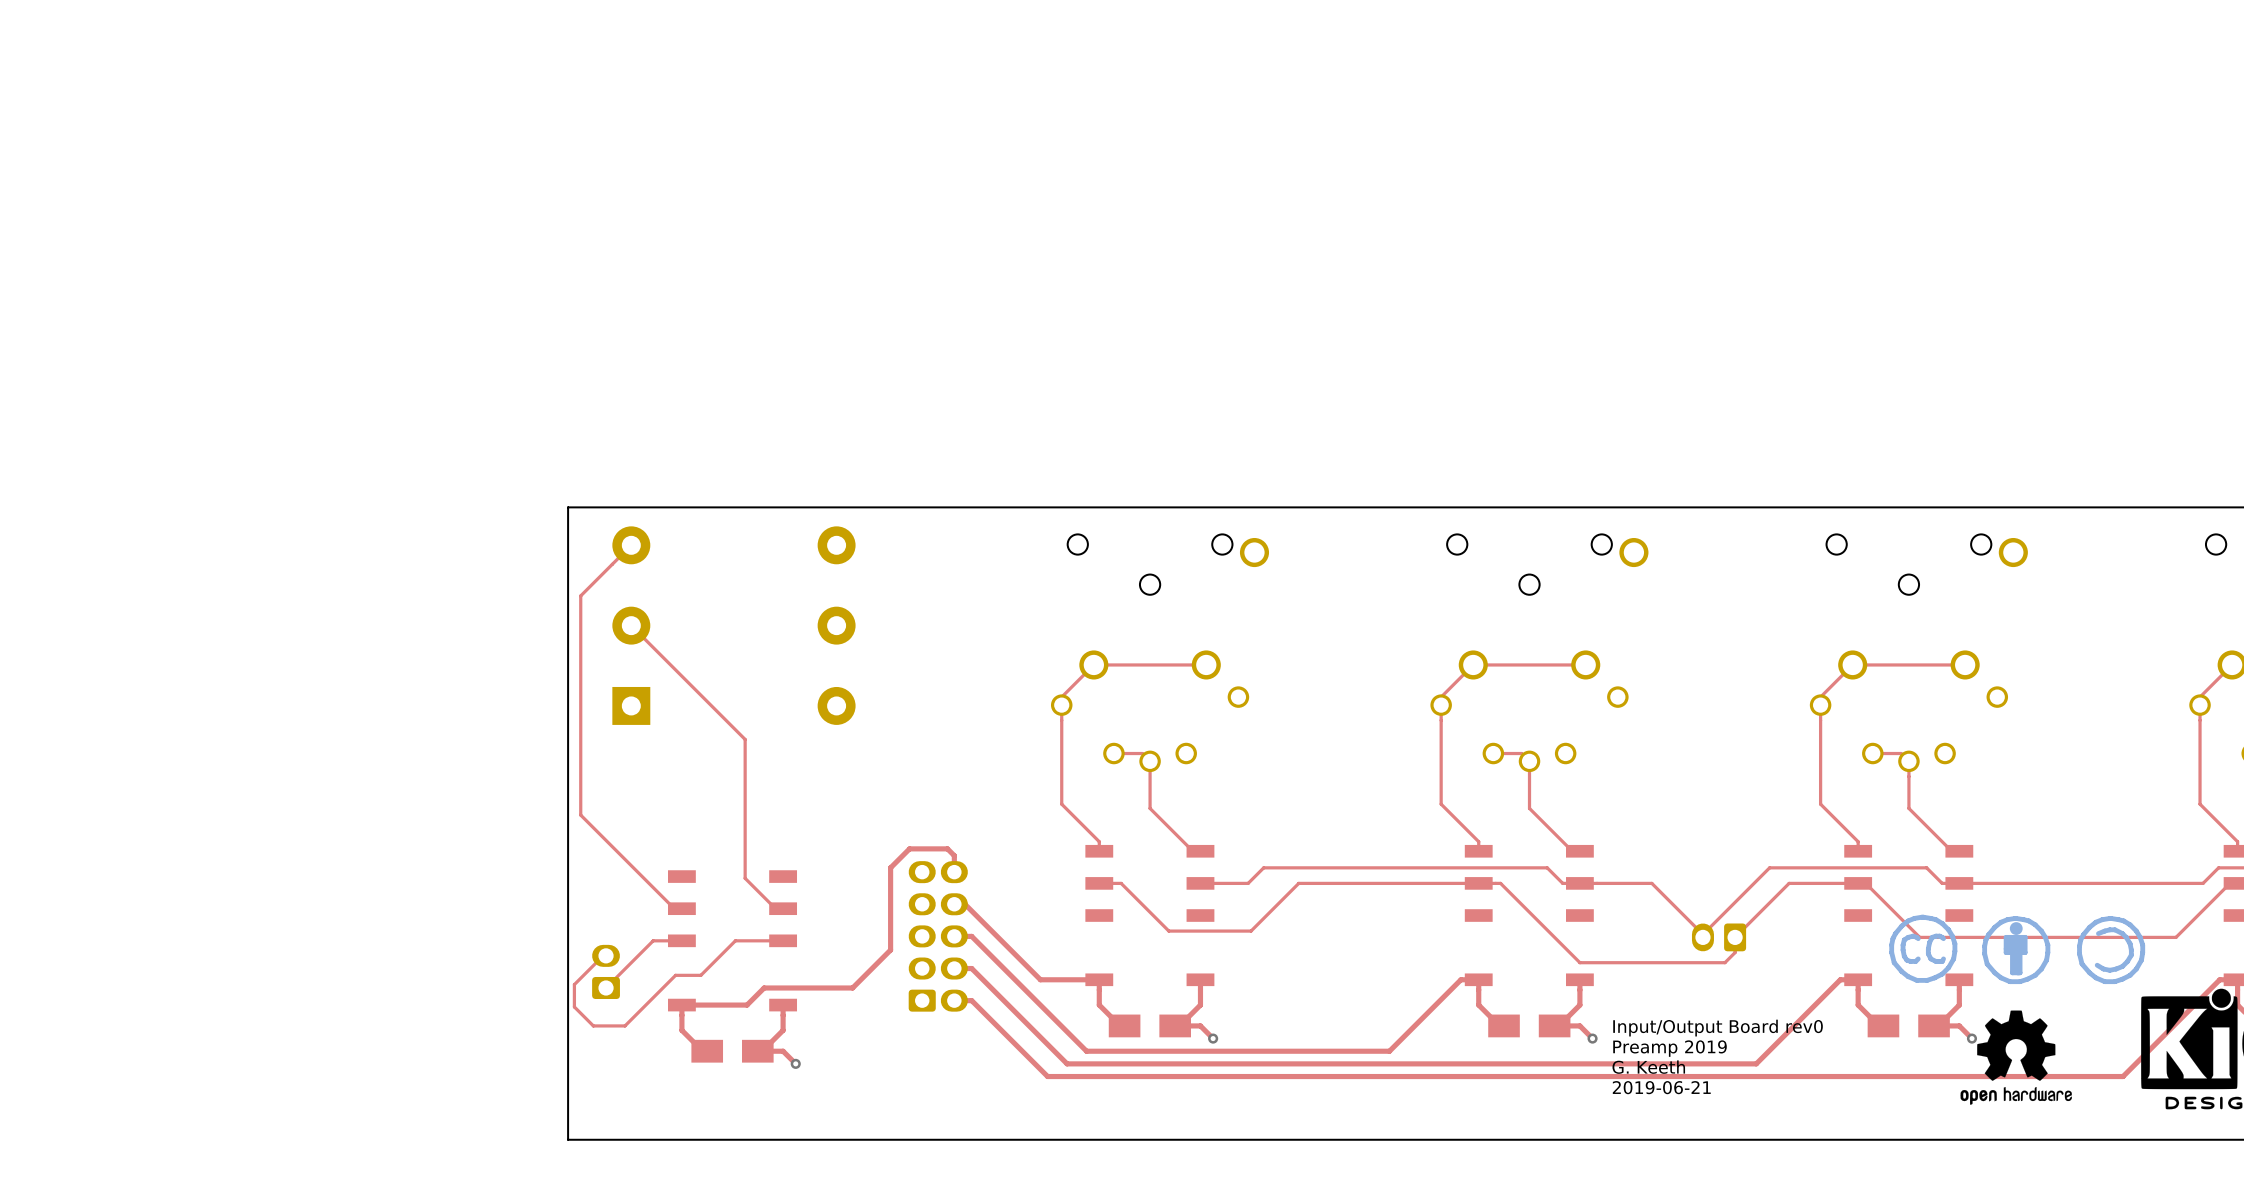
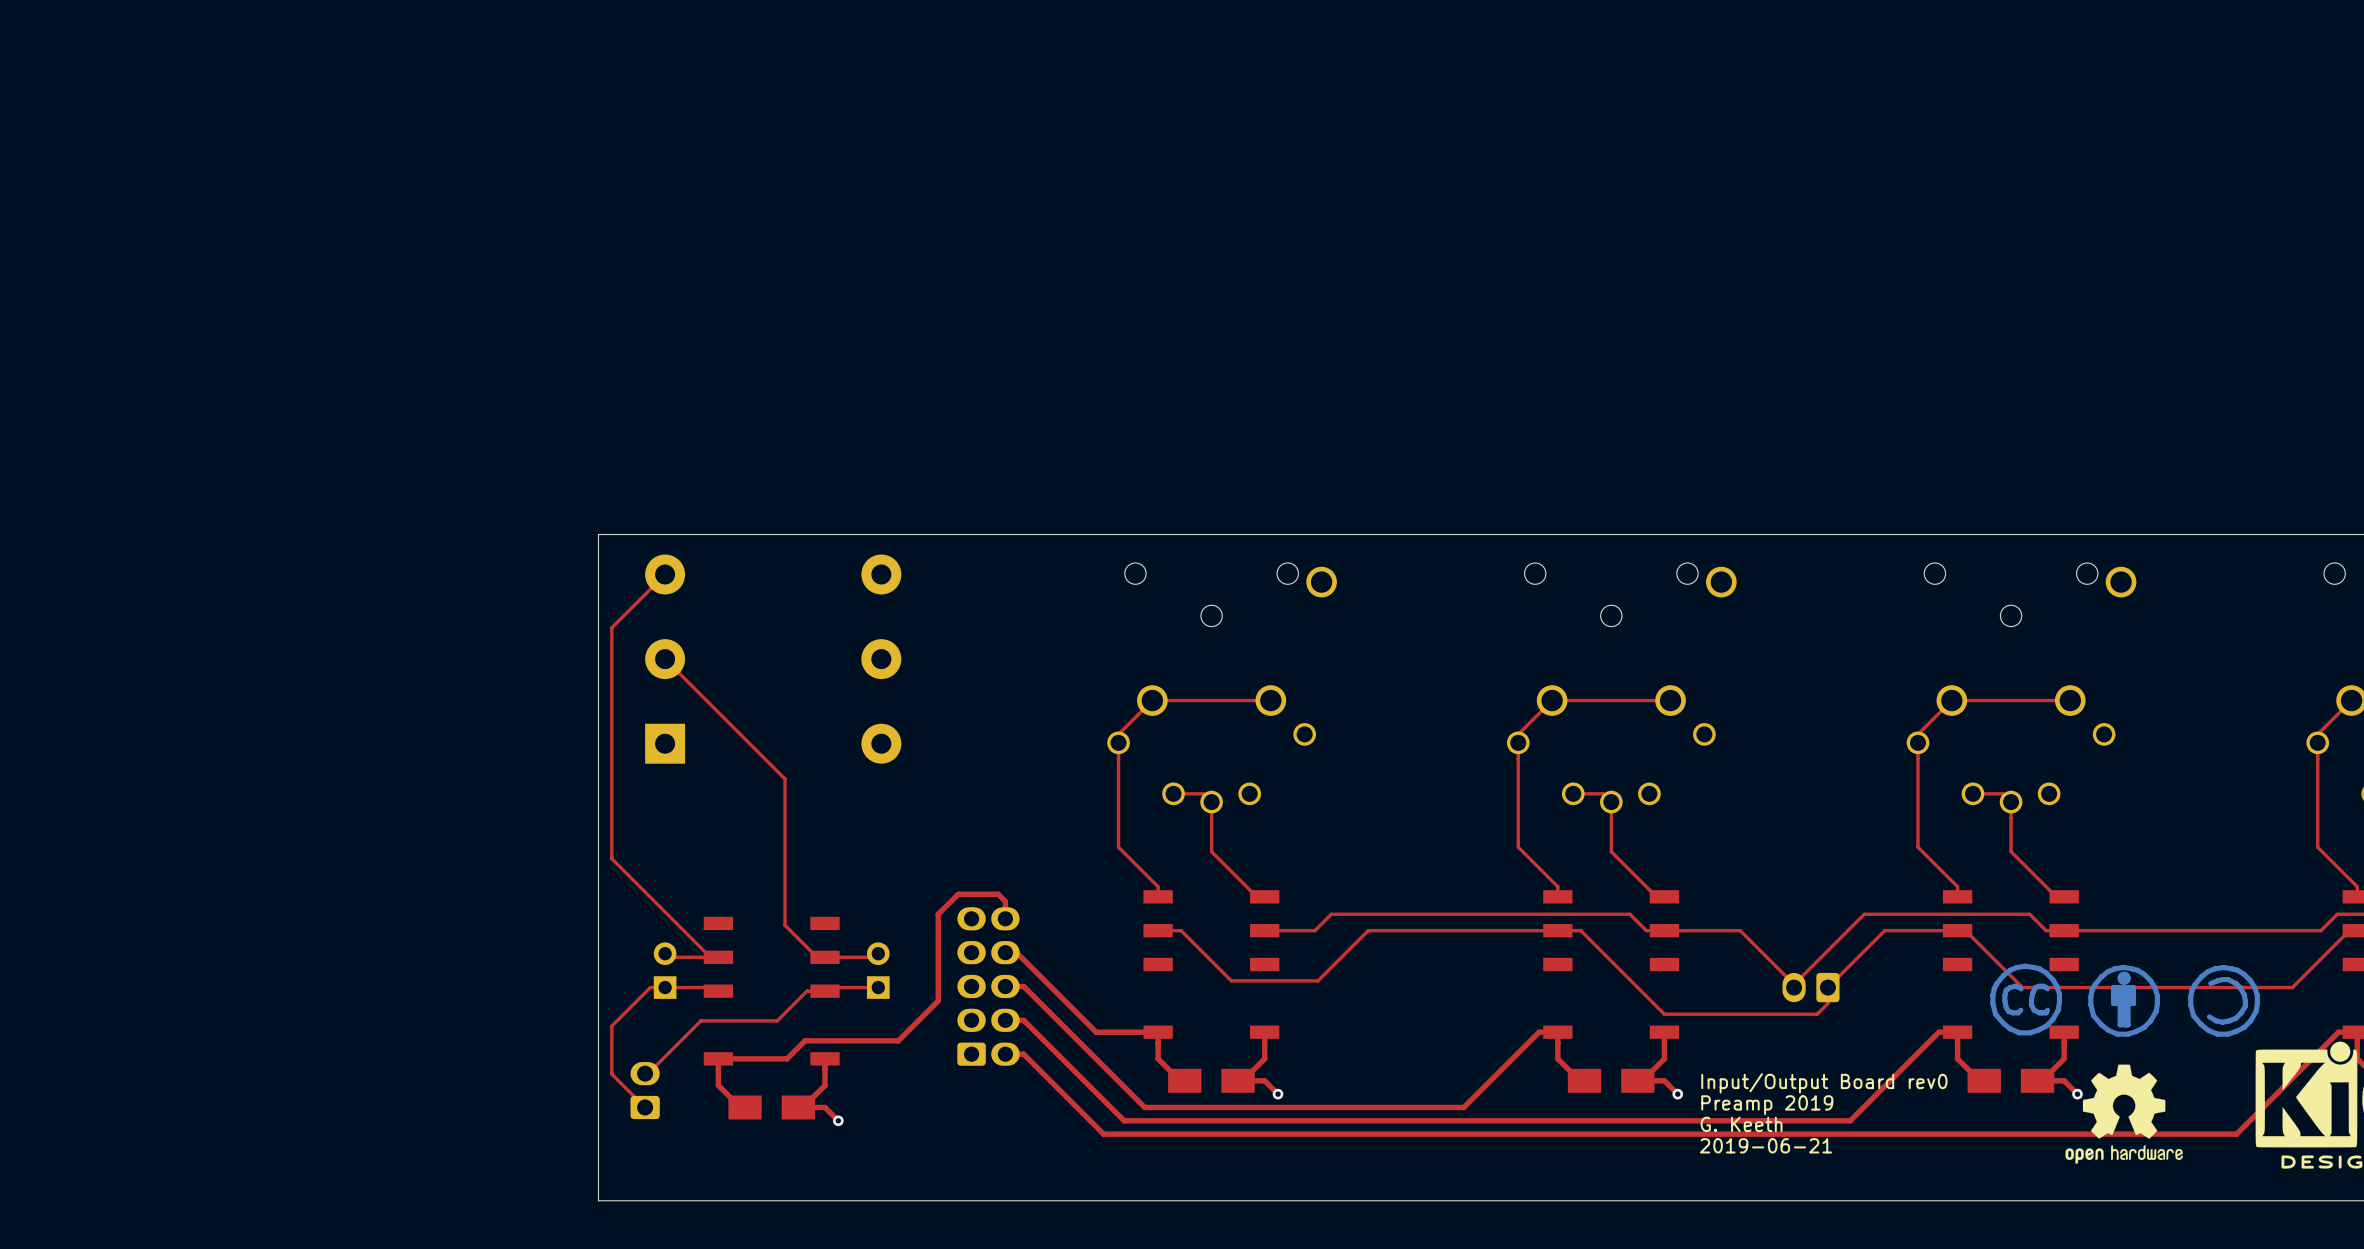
top track: none -> (665, 953) (668, 957) (710, 957)
top track: none -> (878, 953) (874, 957) (825, 957)
part: none -> (665, 970)
part: none -> (878, 970)
top track: none -> (878, 987) (828, 987) (825, 991)
top track: (681, 940) (653, 940) (606, 987) -> (718, 991) (714, 987) (650, 987) (611, 1026) (611, 1074) (645, 1107)
top track: (765, 940) (735, 940) (700, 975) (675, 975) (625, 1025) (593, 1025) (574, 1006) (574, 984) (603, 955) (606, 955) -> (806, 991) (777, 1020) (700, 1020) (648, 1073) (645, 1073)
part position: (606, 971) -> (645, 1090)

